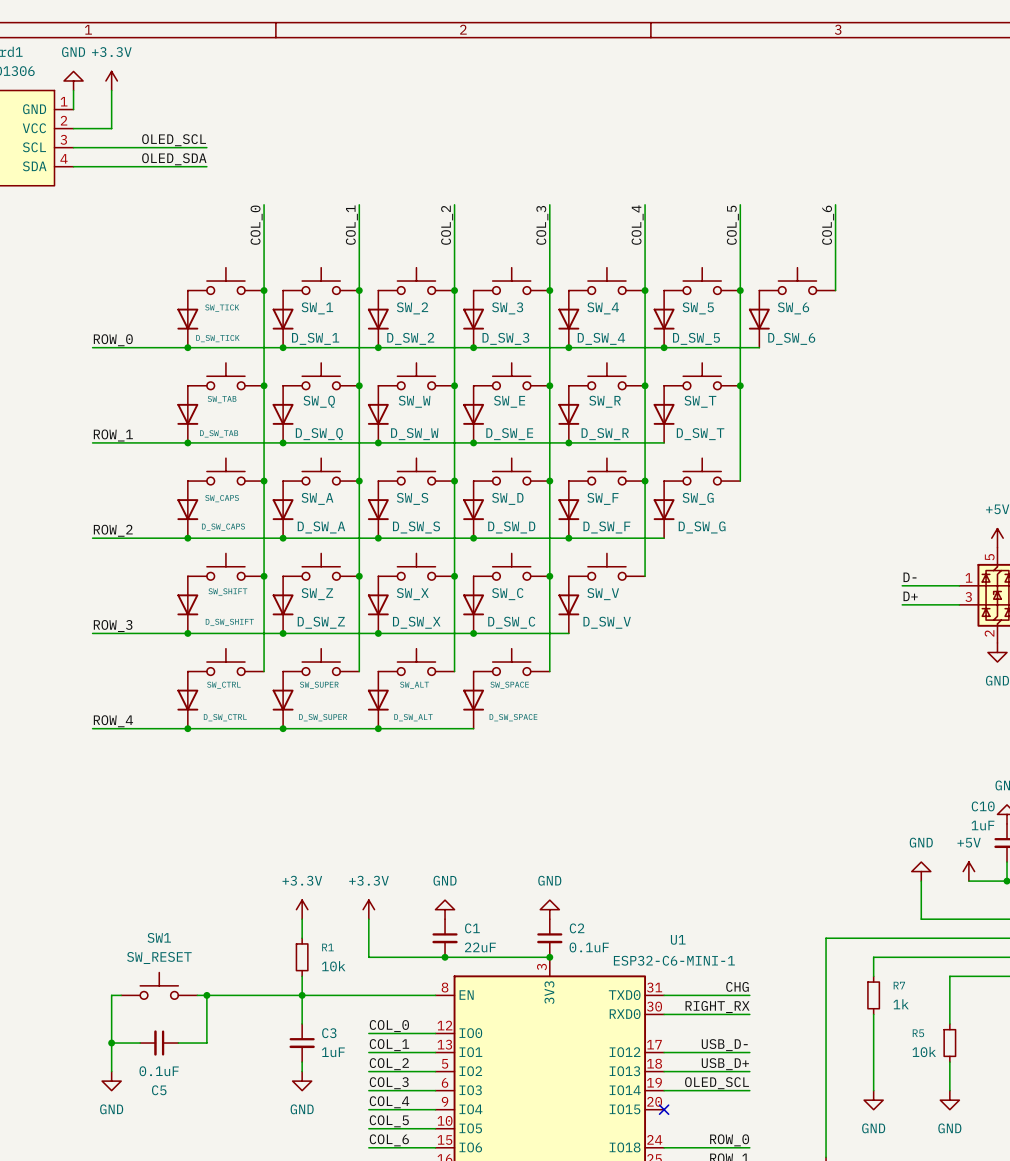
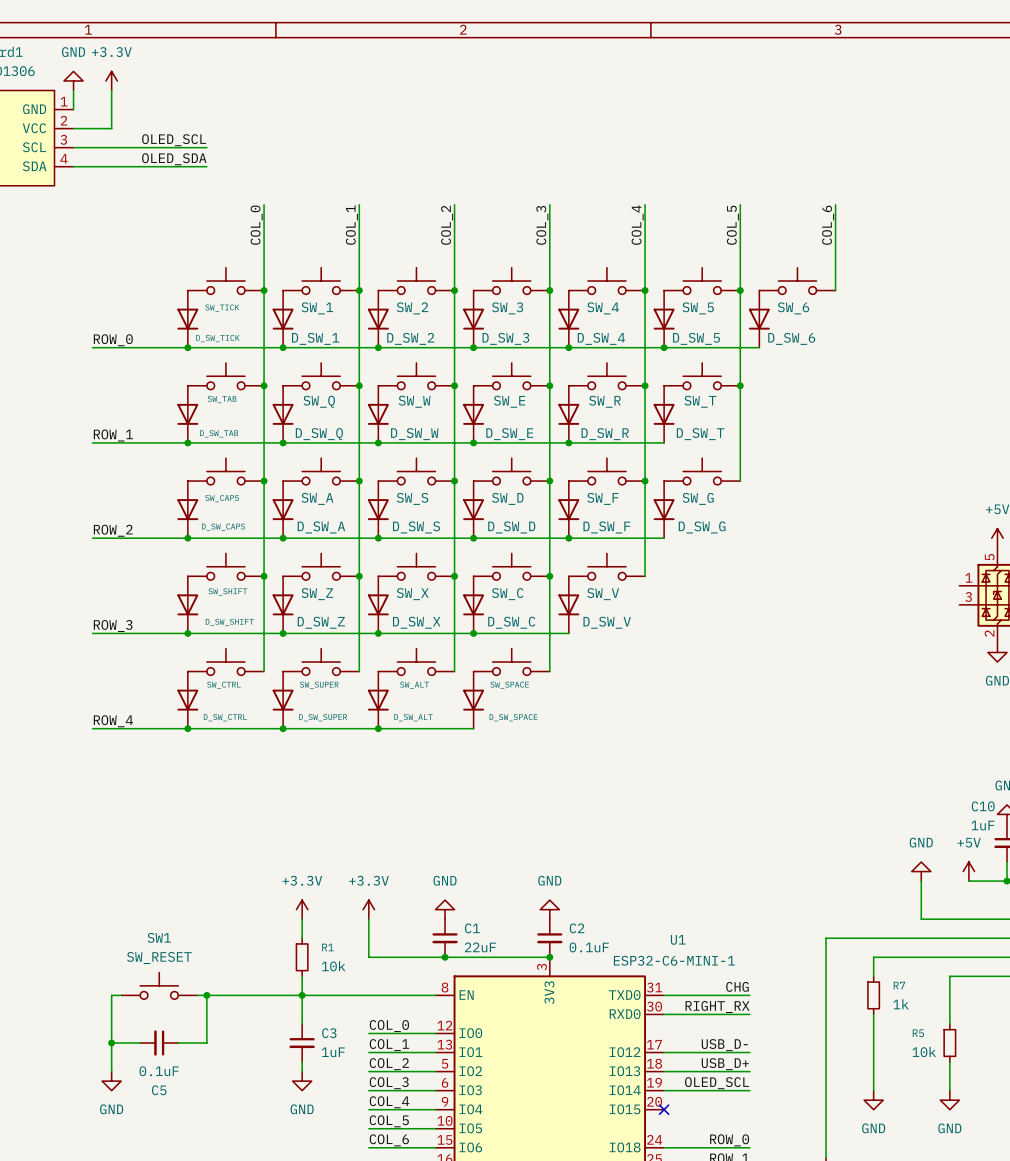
label: D- (910, 577) -> none
wire: (902, 585) (959, 585) -> none
label: D+ (910, 596) -> none
wire: (902, 604) (959, 604) -> none

